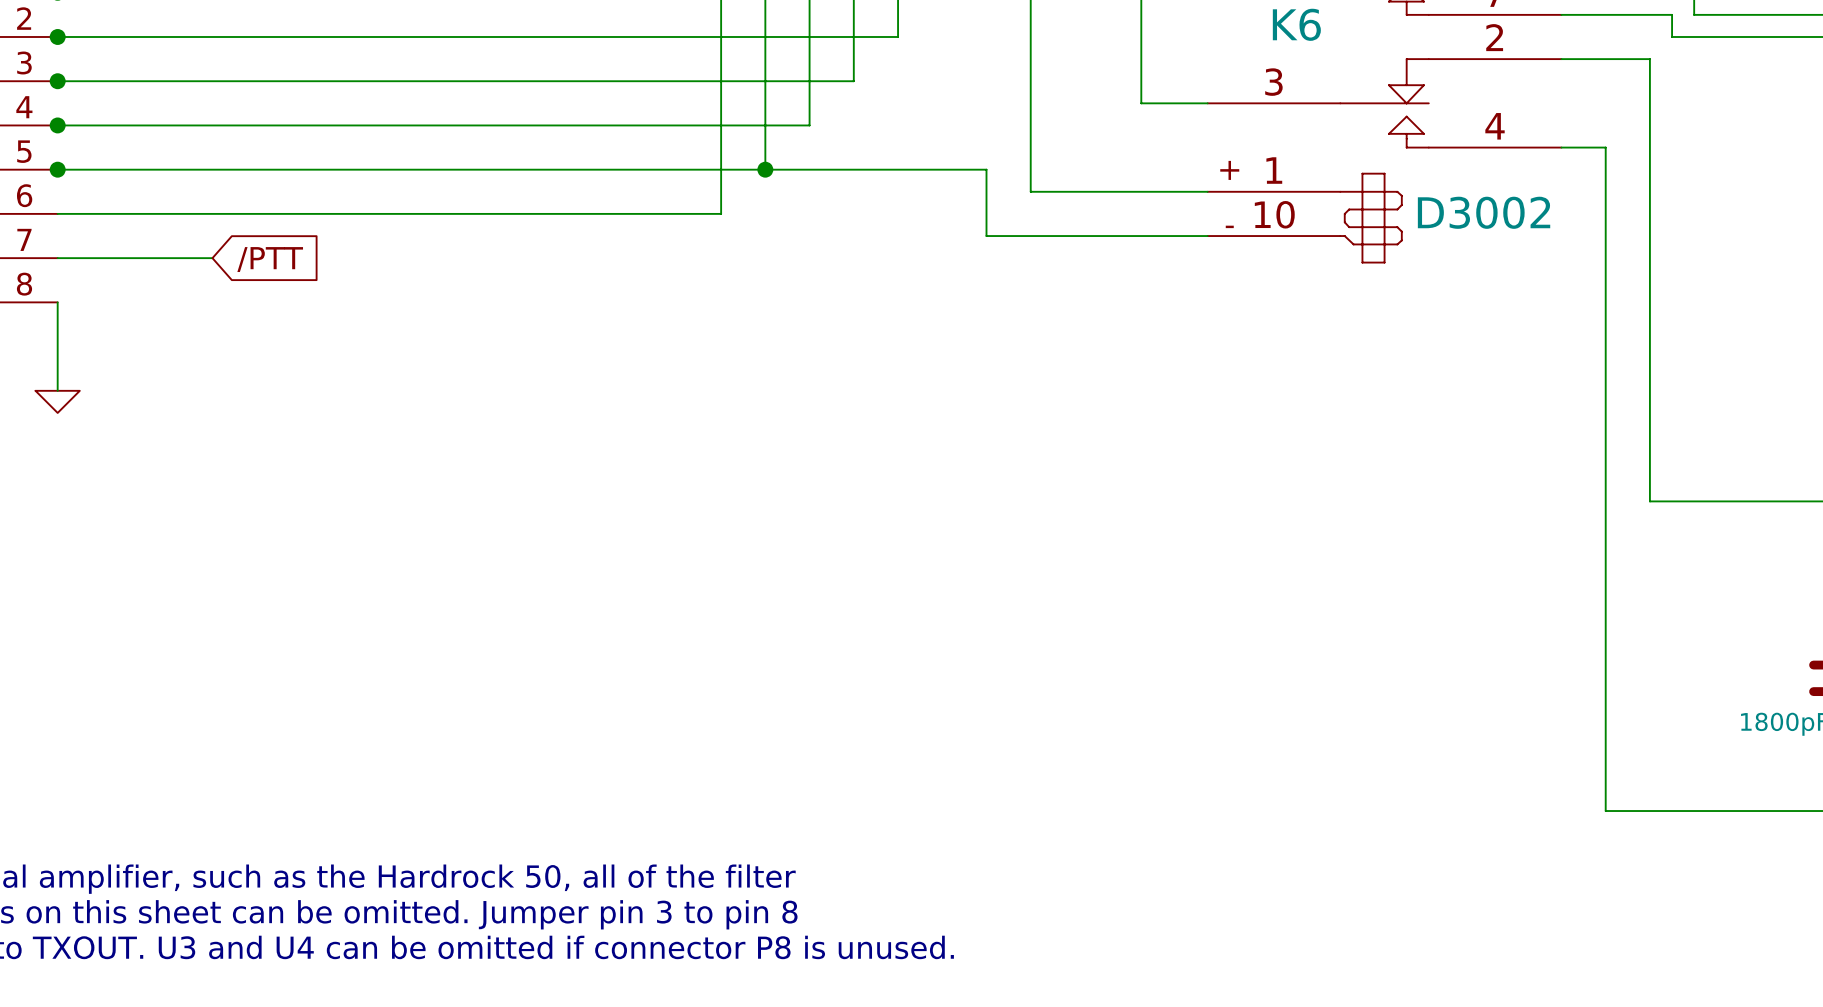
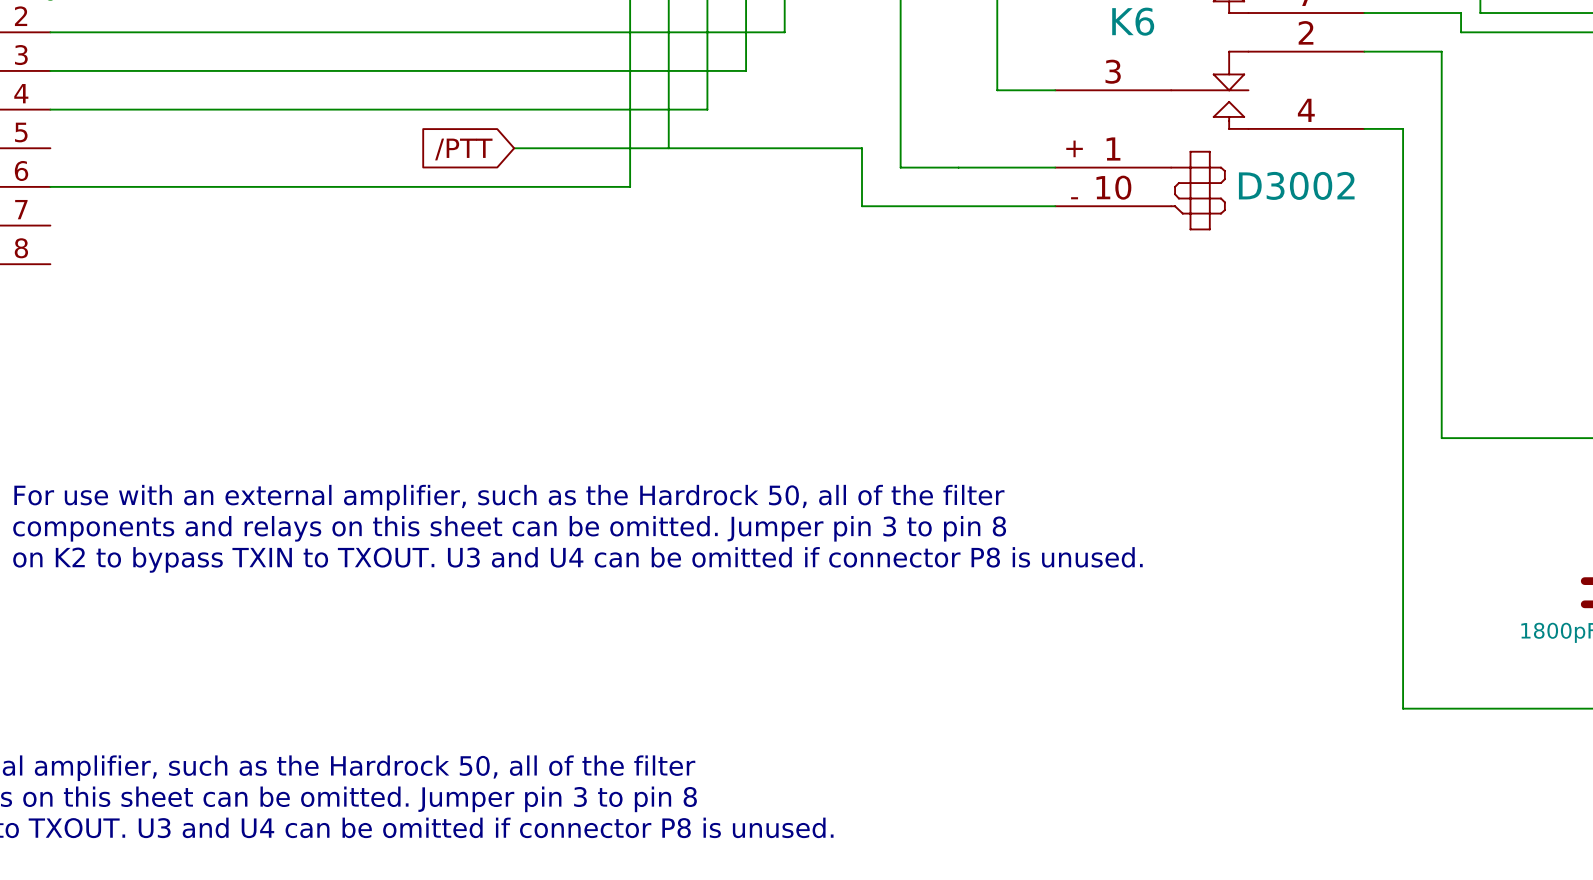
junction: (57, 36) -> none
junction: (57, 81) -> none
junction: (57, 125) -> none
wire: (57, 169) (588, 169) -> none
junction: (57, 169) -> none
junction: (765, 169) -> none
wire: (57, 258) (212, 258) -> none
global label rotation: 0° (270, 259) -> 180° (463, 149)
global label position: /PTT (270, 259) -> /PTT (463, 149)
wire: (57, 302) (57, 390) -> none
power symbol: (57, 401) -> none
text: none -> For use with an external amplifier, such as the Hardrock 50, all of the filter (509, 497)
text: none -> components and relays on this sheet can be omitted. Jumper pin 3 to pin 8 (509, 528)
text: none -> on K2 to bypass TXIN to TXOUT. U3 and U4 can be omitted if connector P8 is unused. (577, 559)

